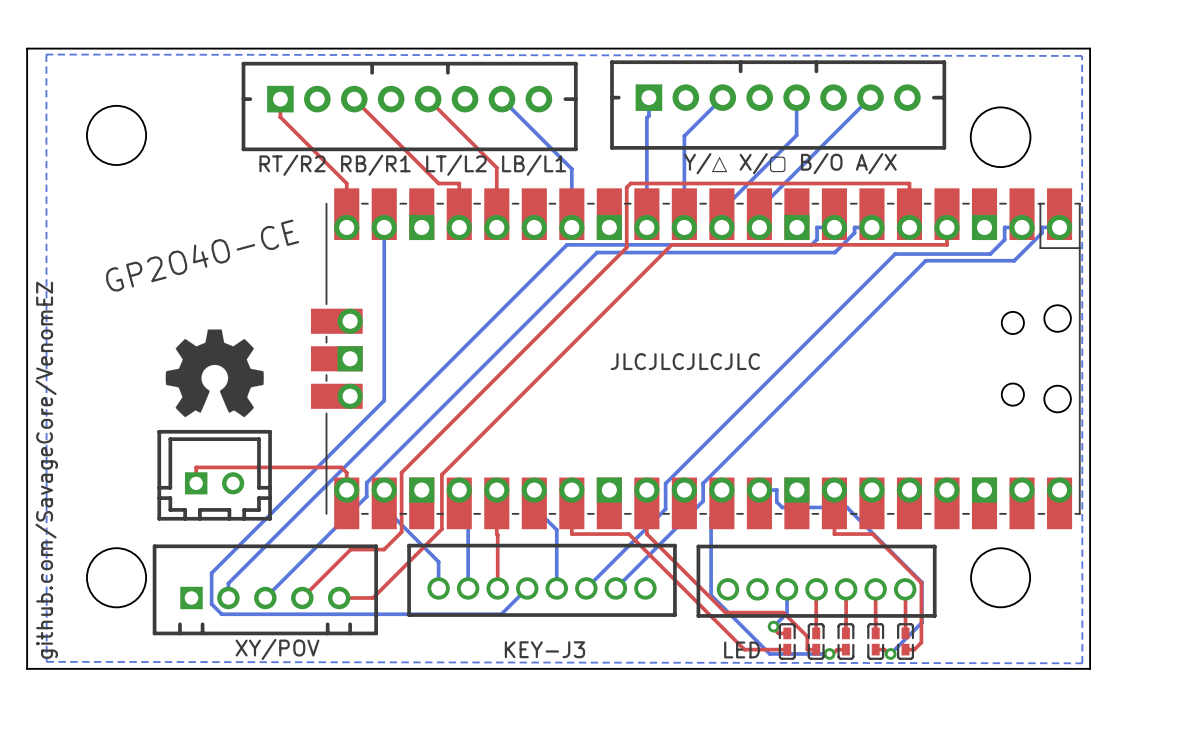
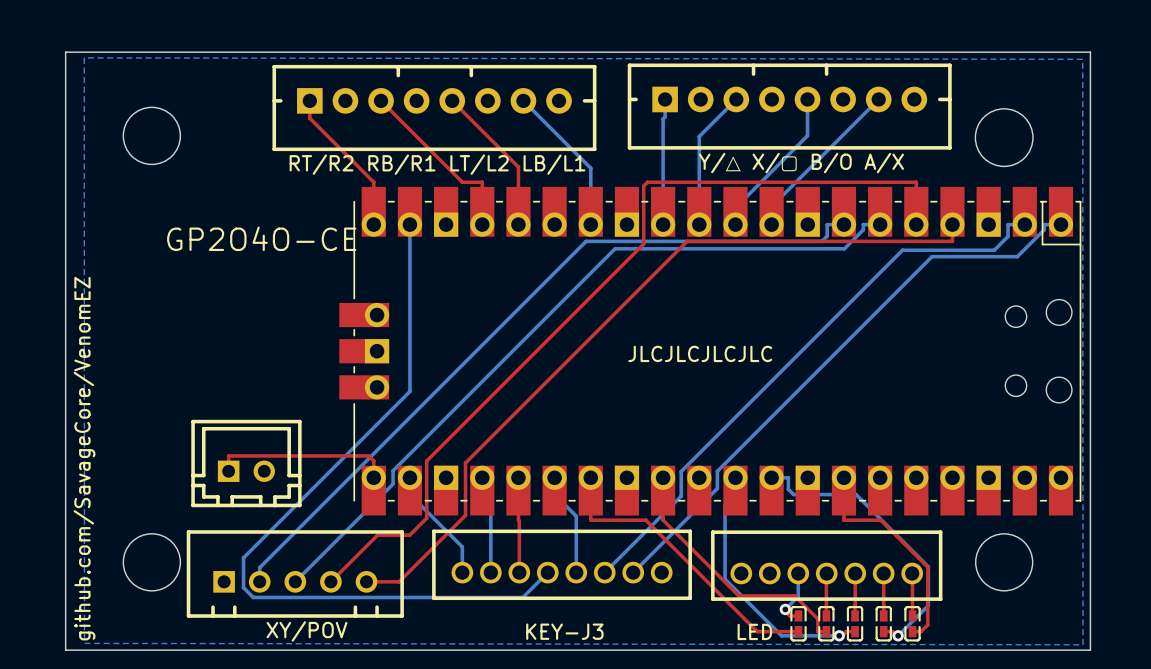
text rotation: 0° (202, 255) -> 15° clockwise (261, 238)
drawing: [165, 329, 264, 418] -> none

